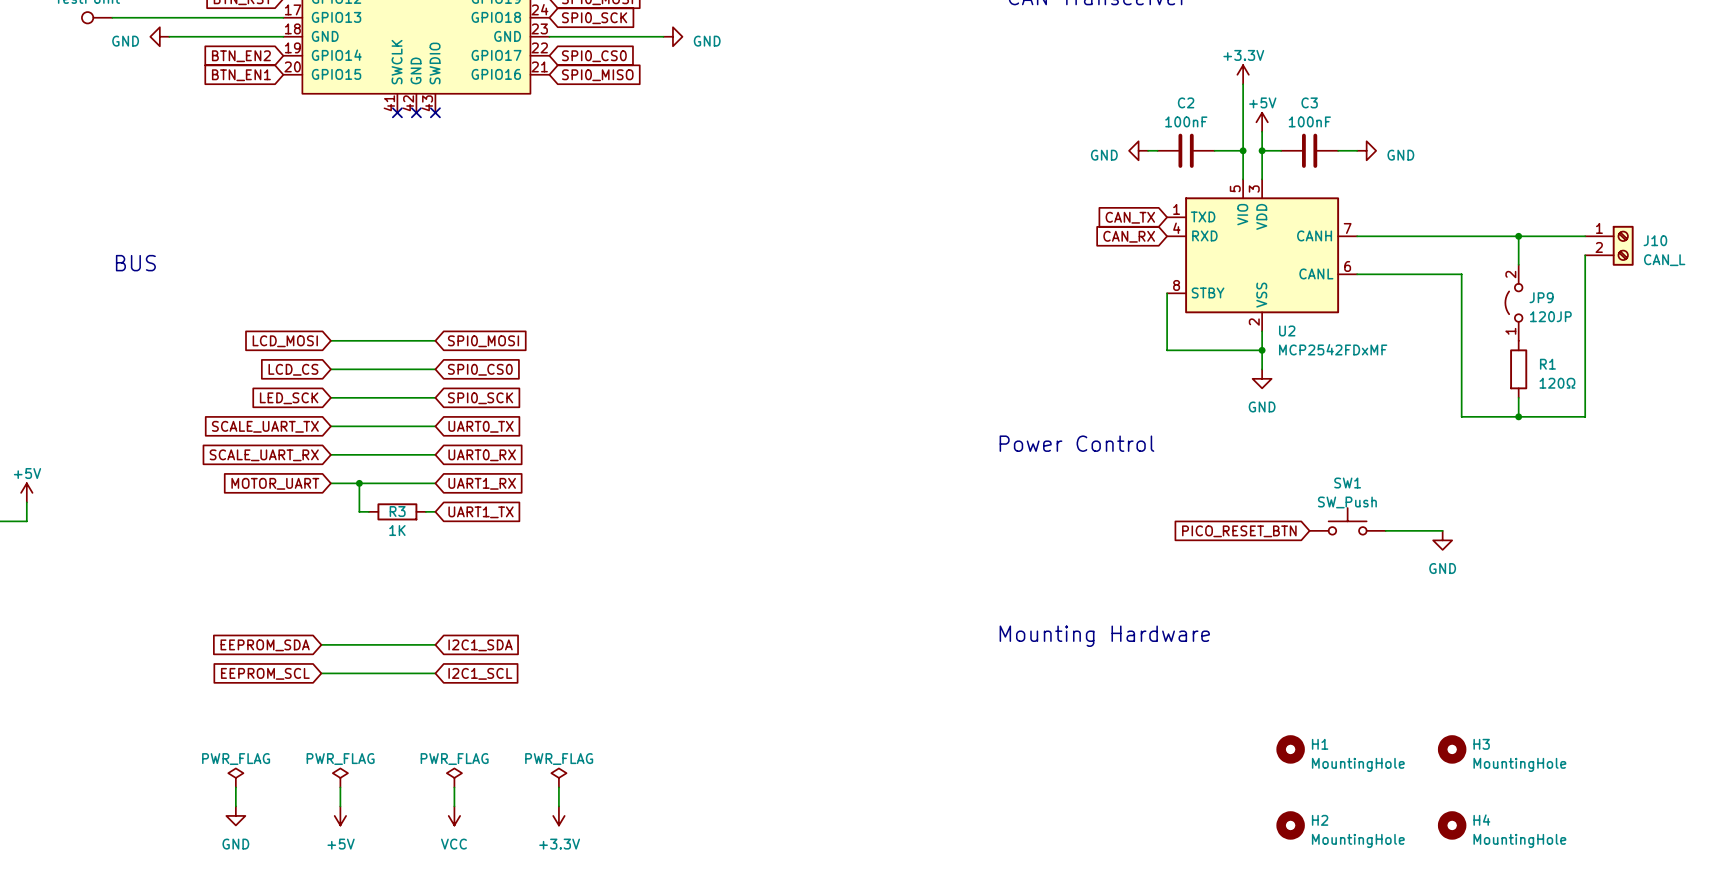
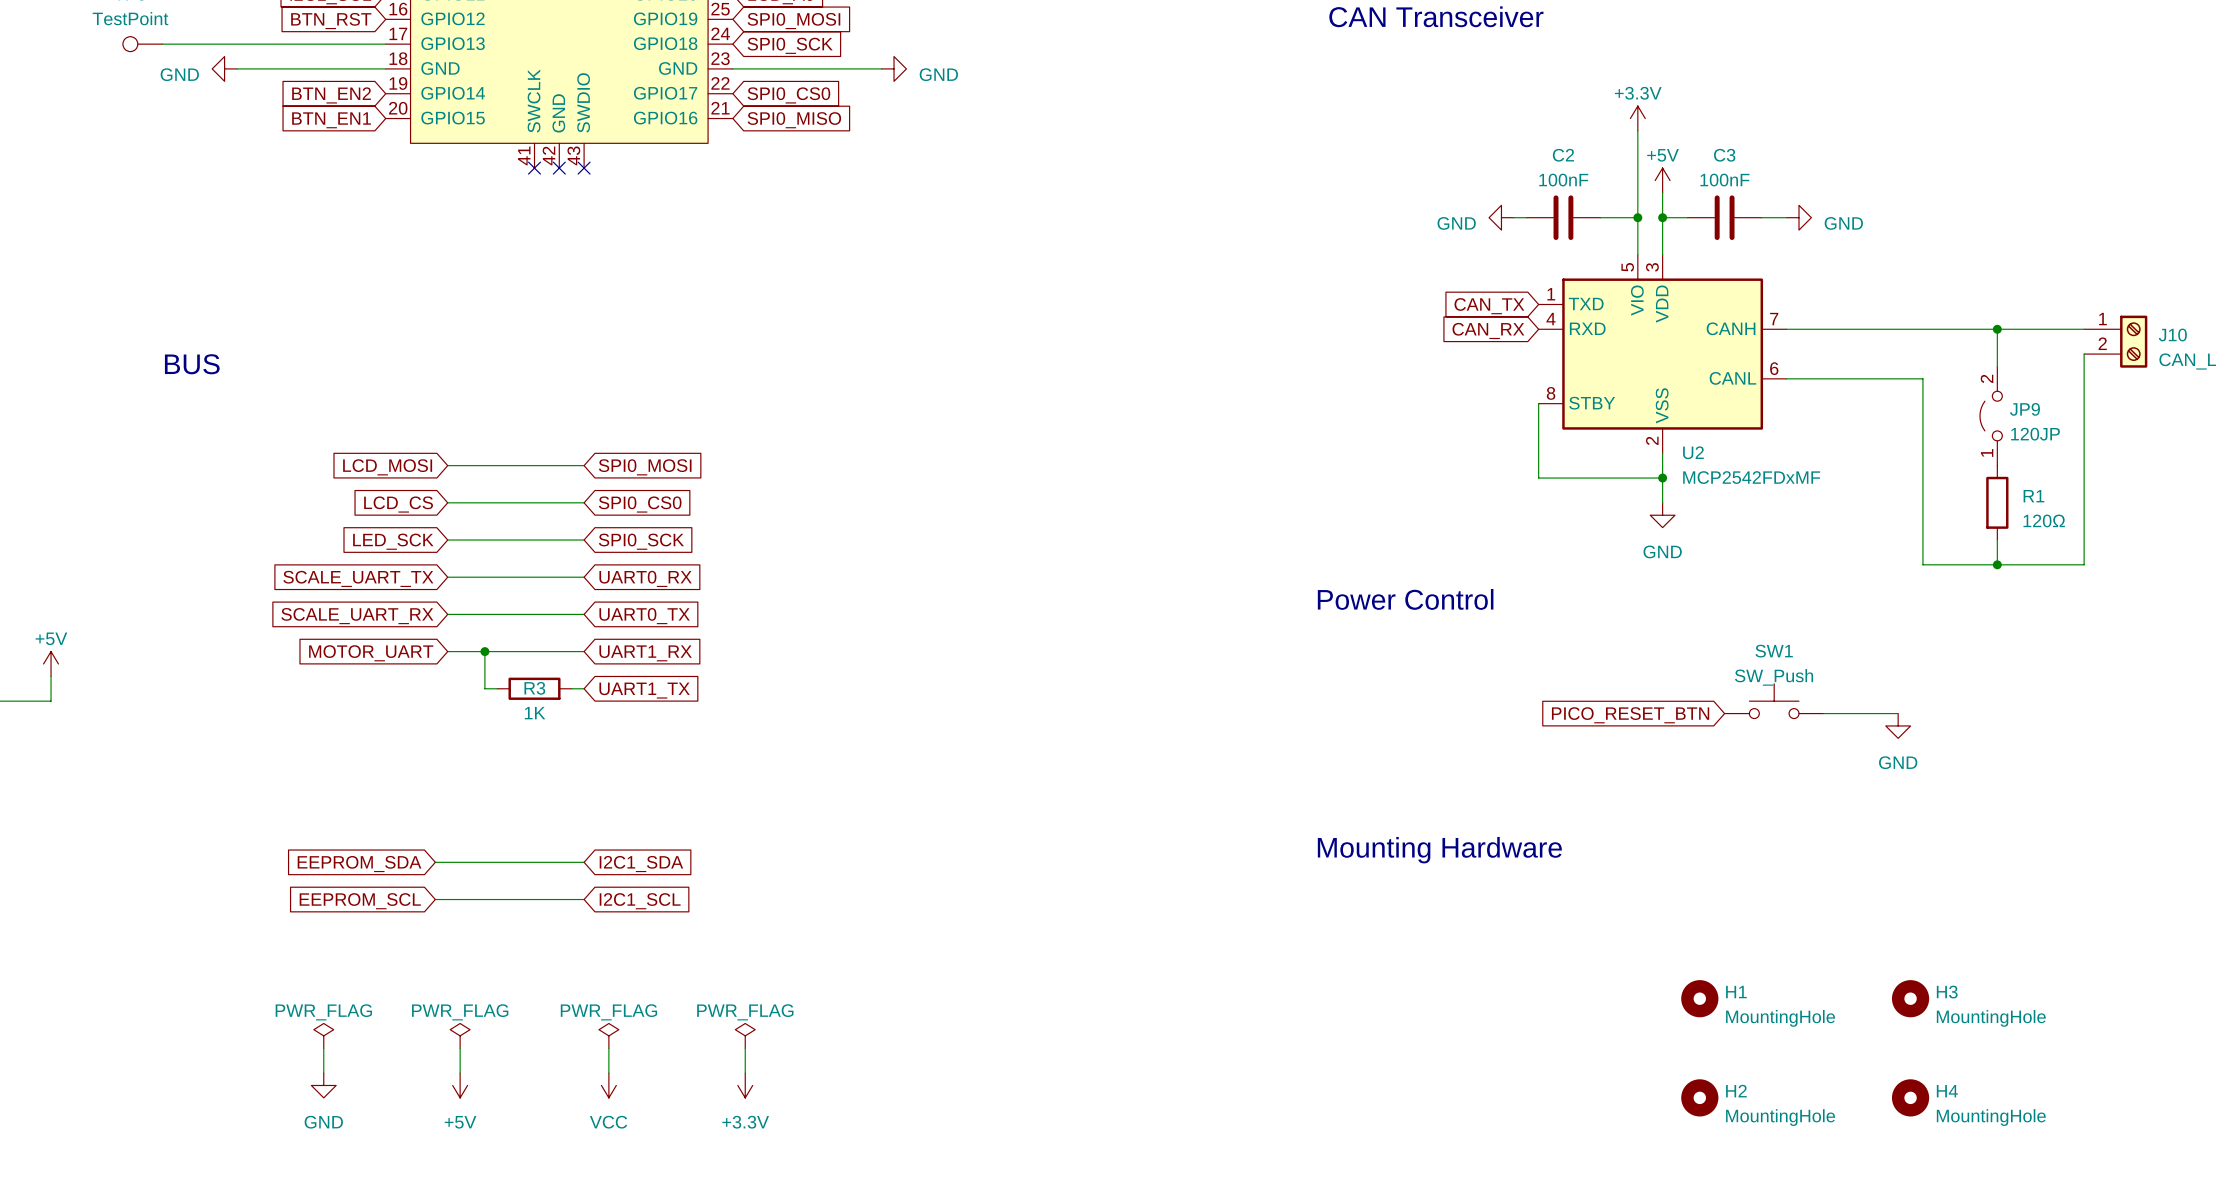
global label: UART0_TX (481, 426) -> UART0_RX (645, 578)
global label: UART0_RX (482, 455) -> UART0_TX (644, 616)

